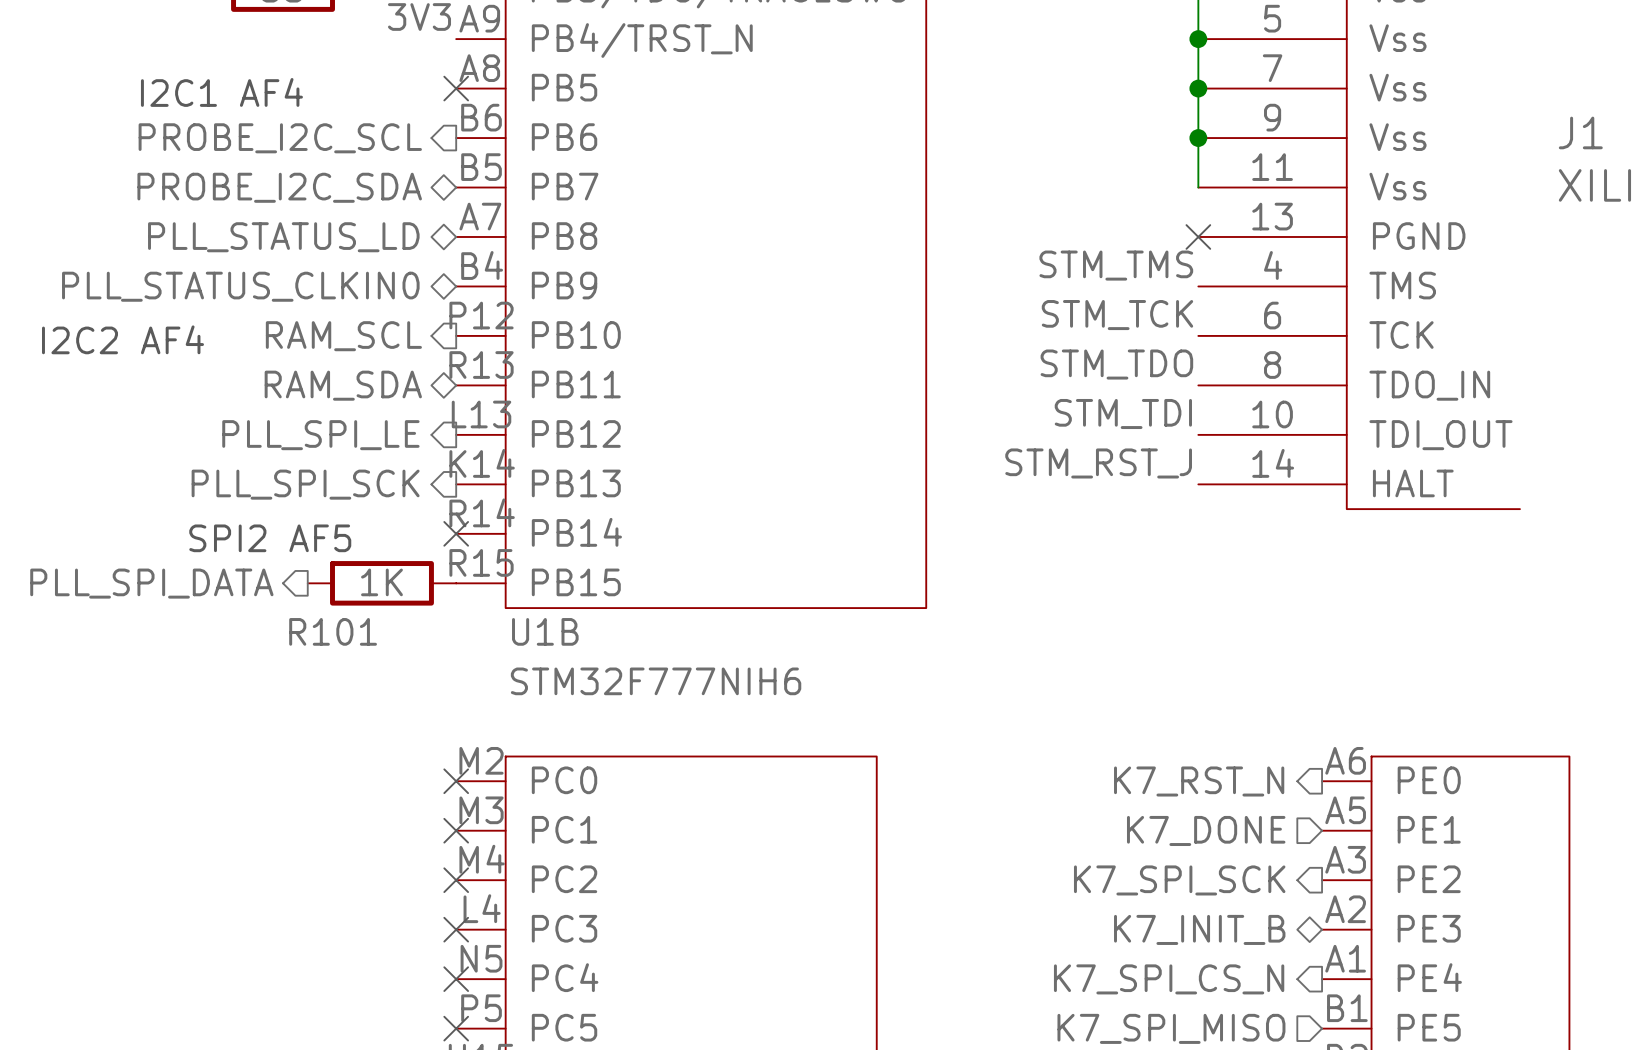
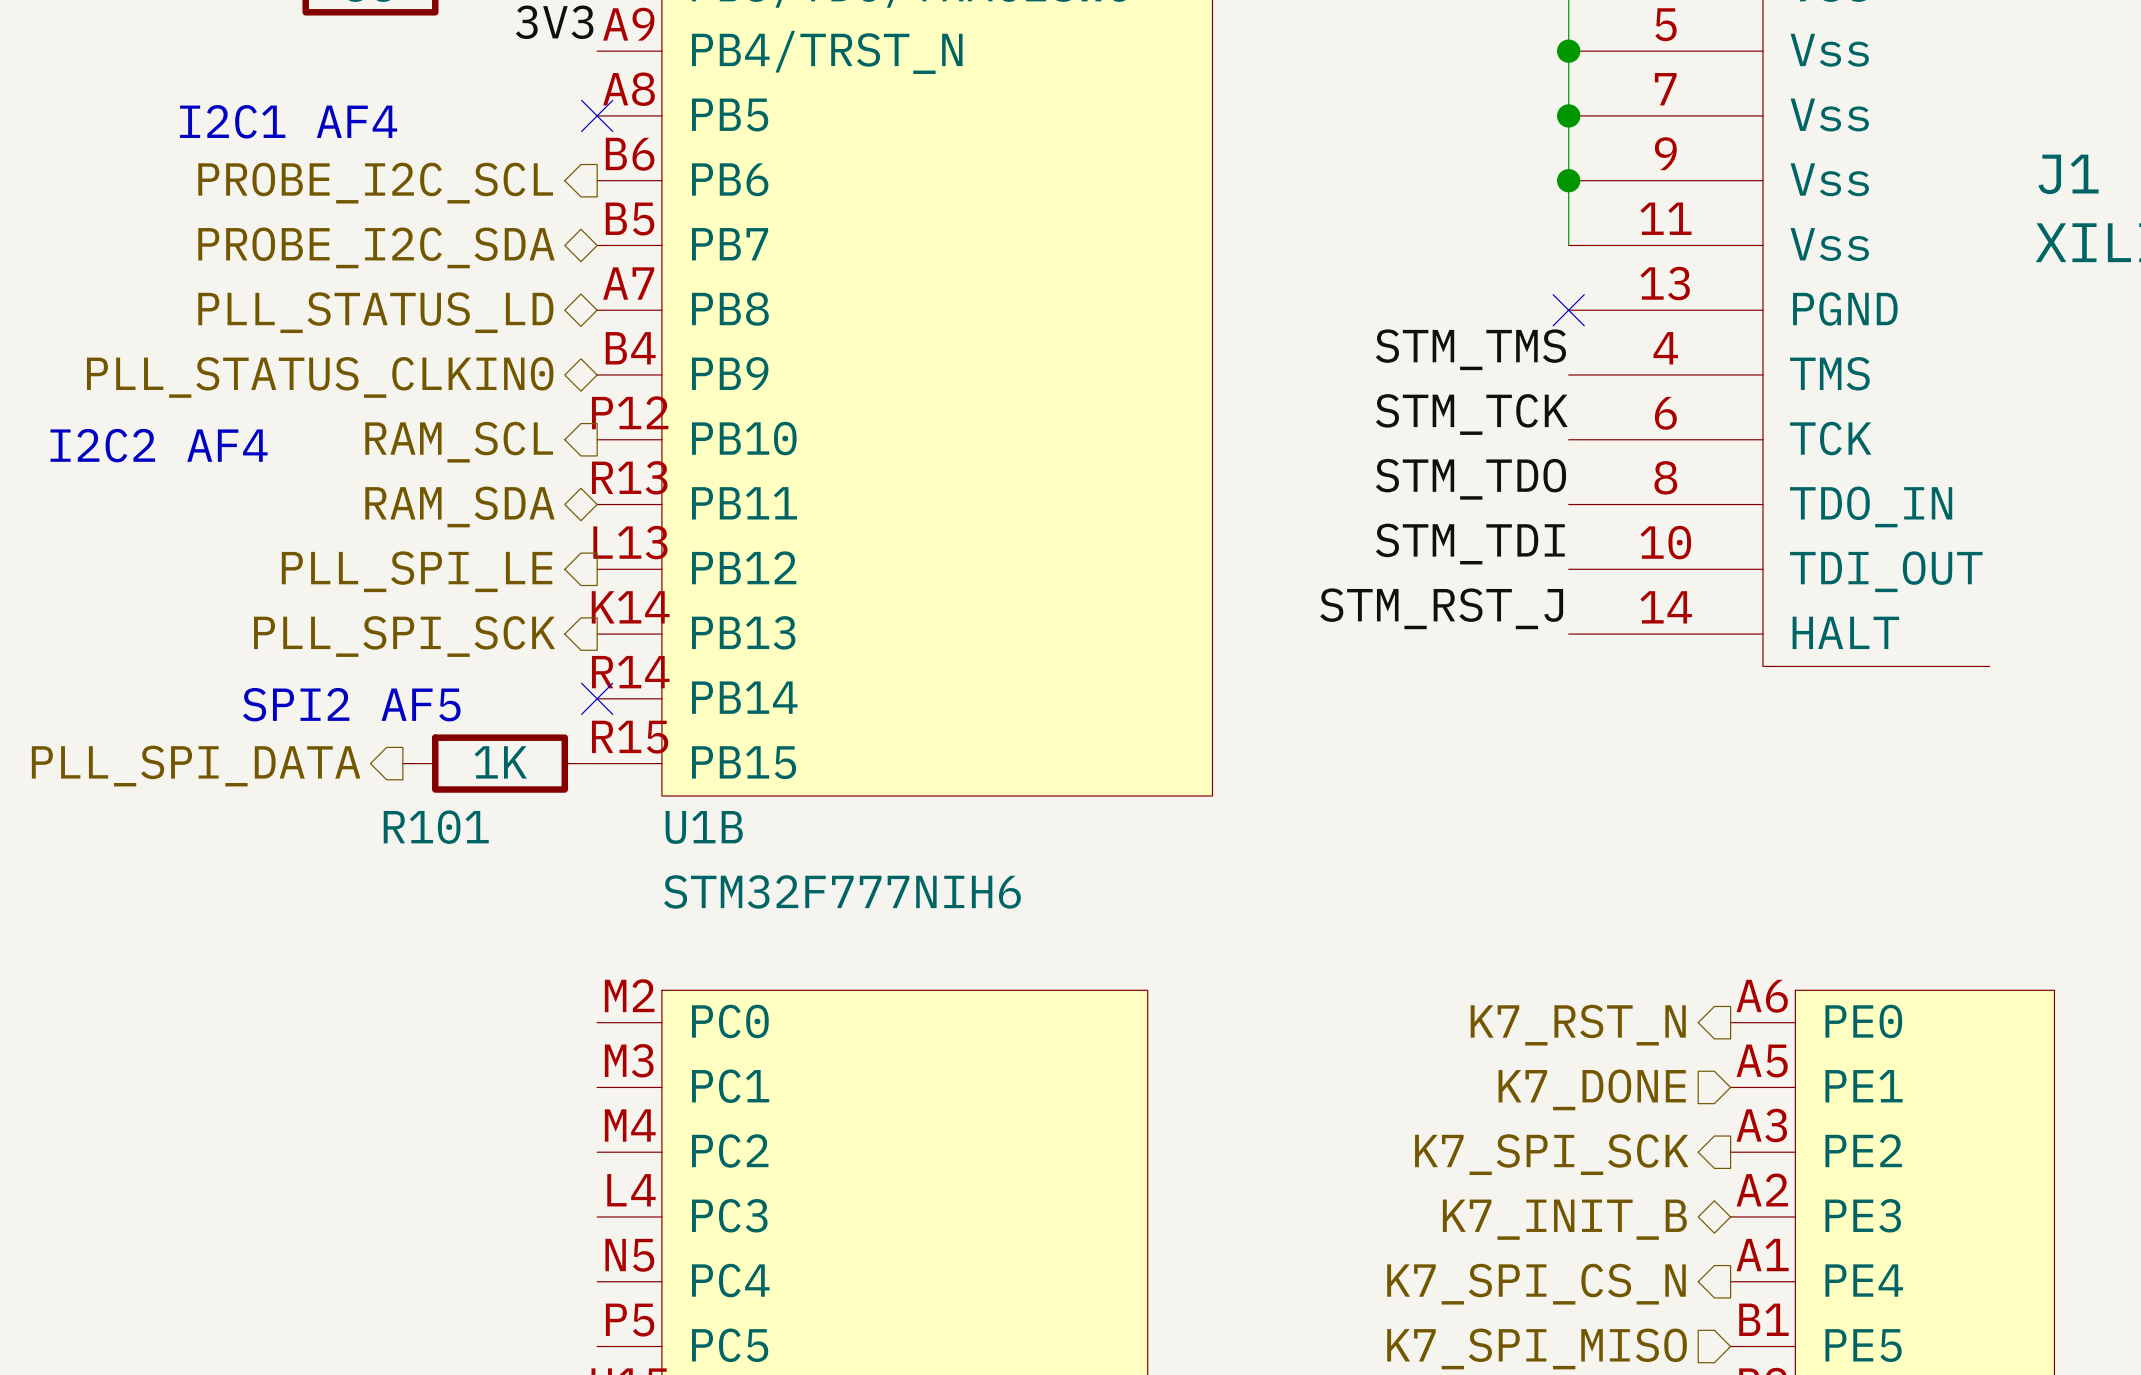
no-connect mark: (456, 781) -> none
no-connect mark: (456, 830) -> none
no-connect mark: (456, 880) -> none
no-connect mark: (456, 929) -> none
no-connect mark: (456, 979) -> none
no-connect mark: (456, 1028) -> none

